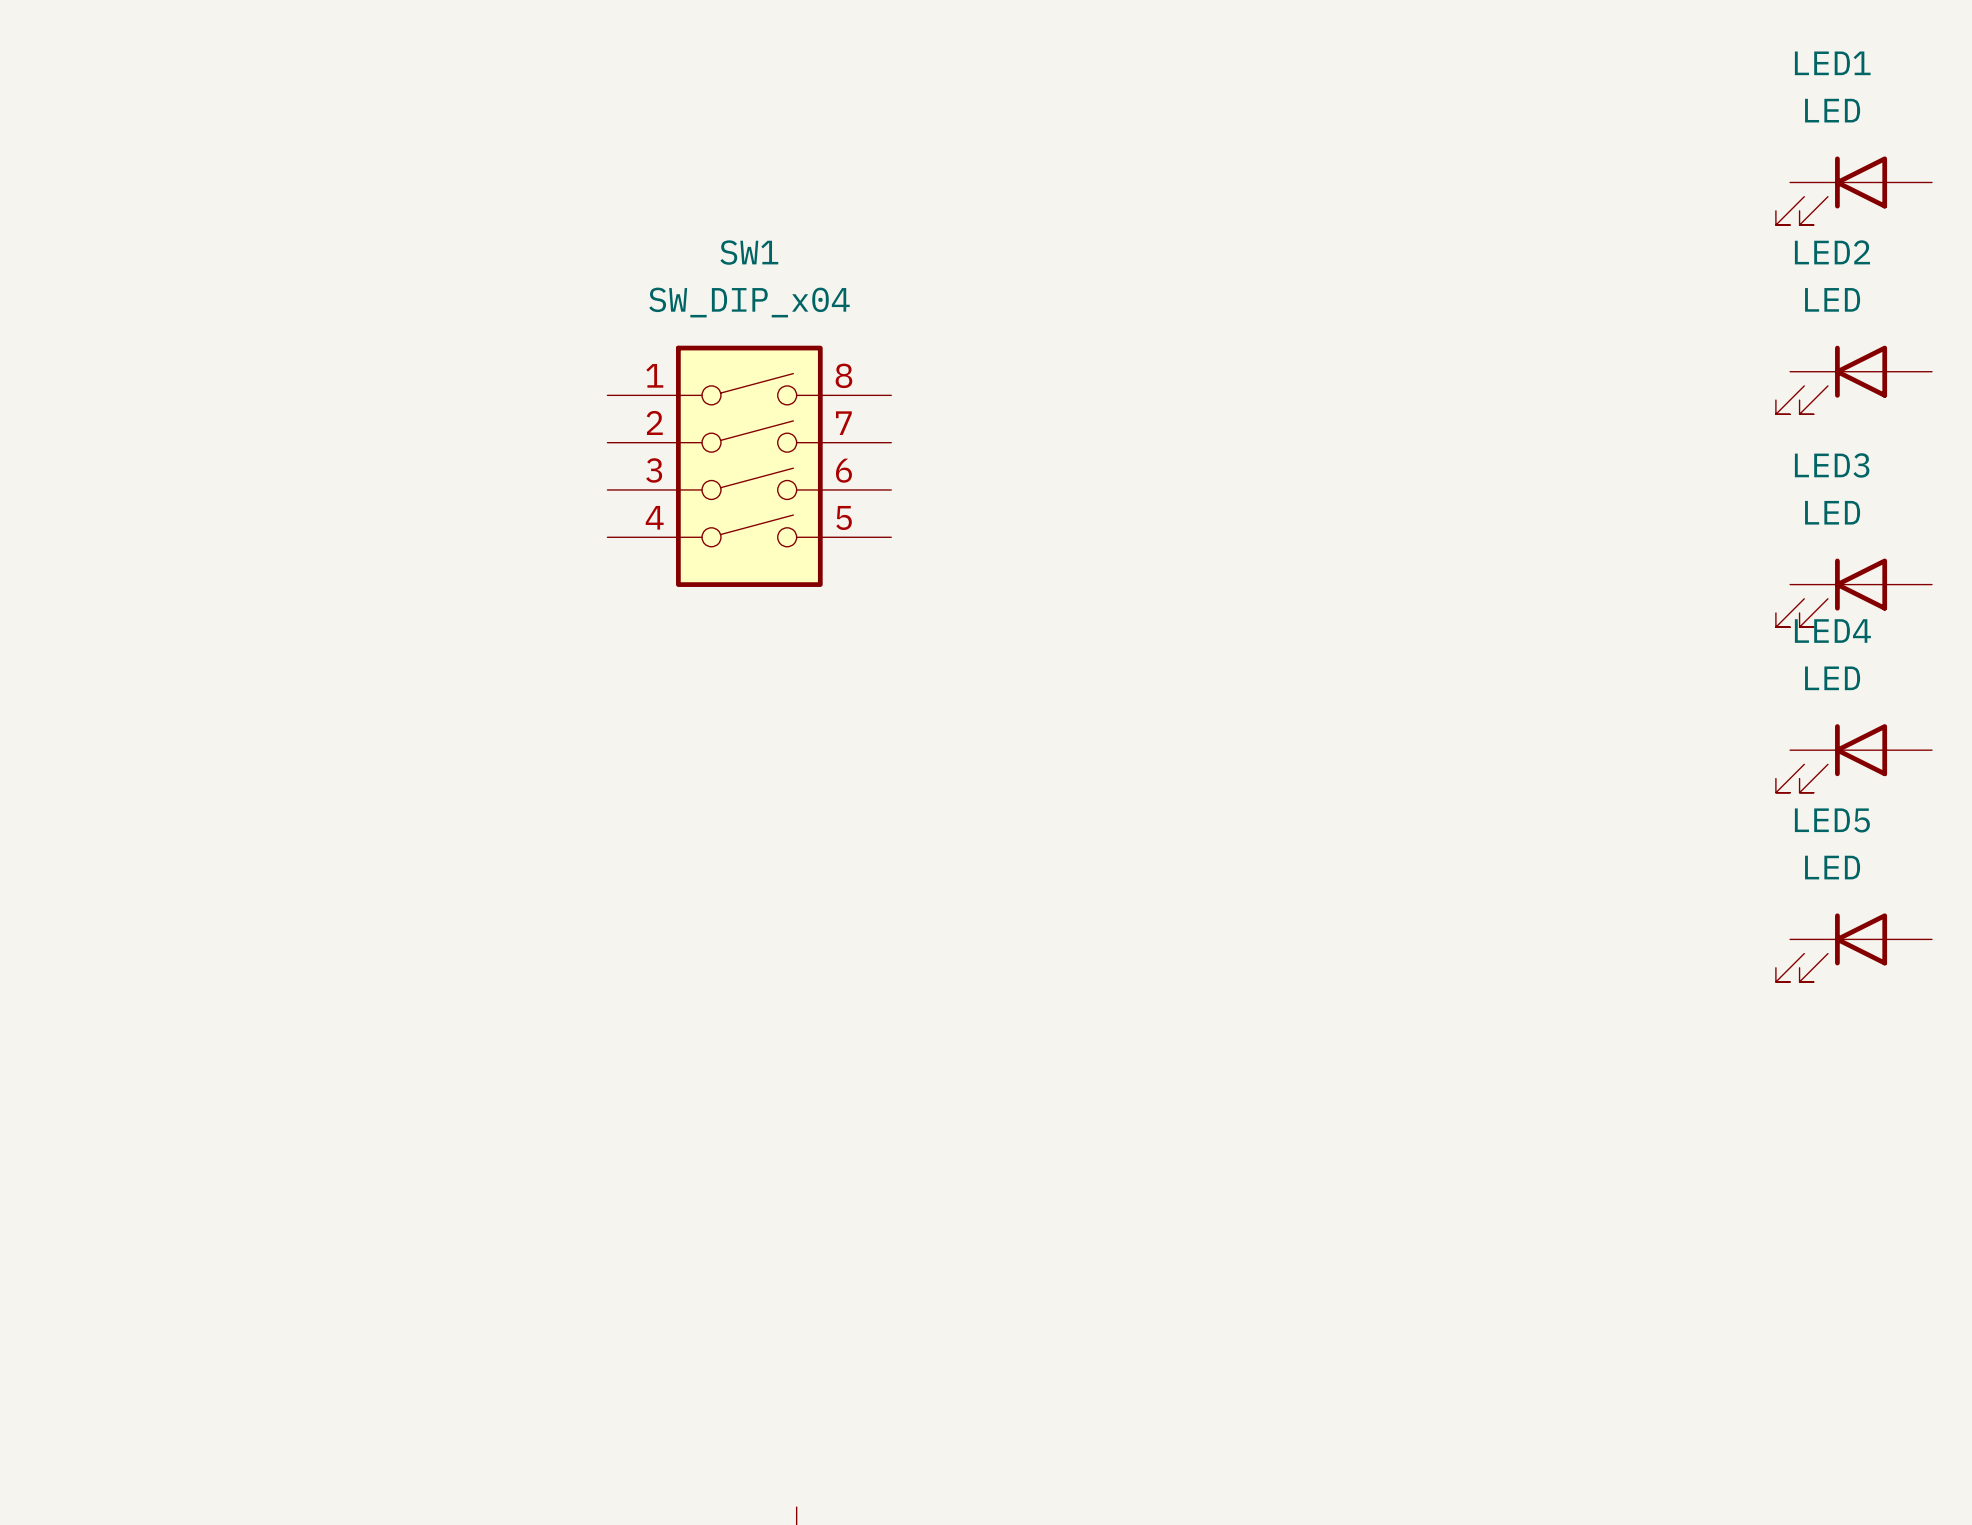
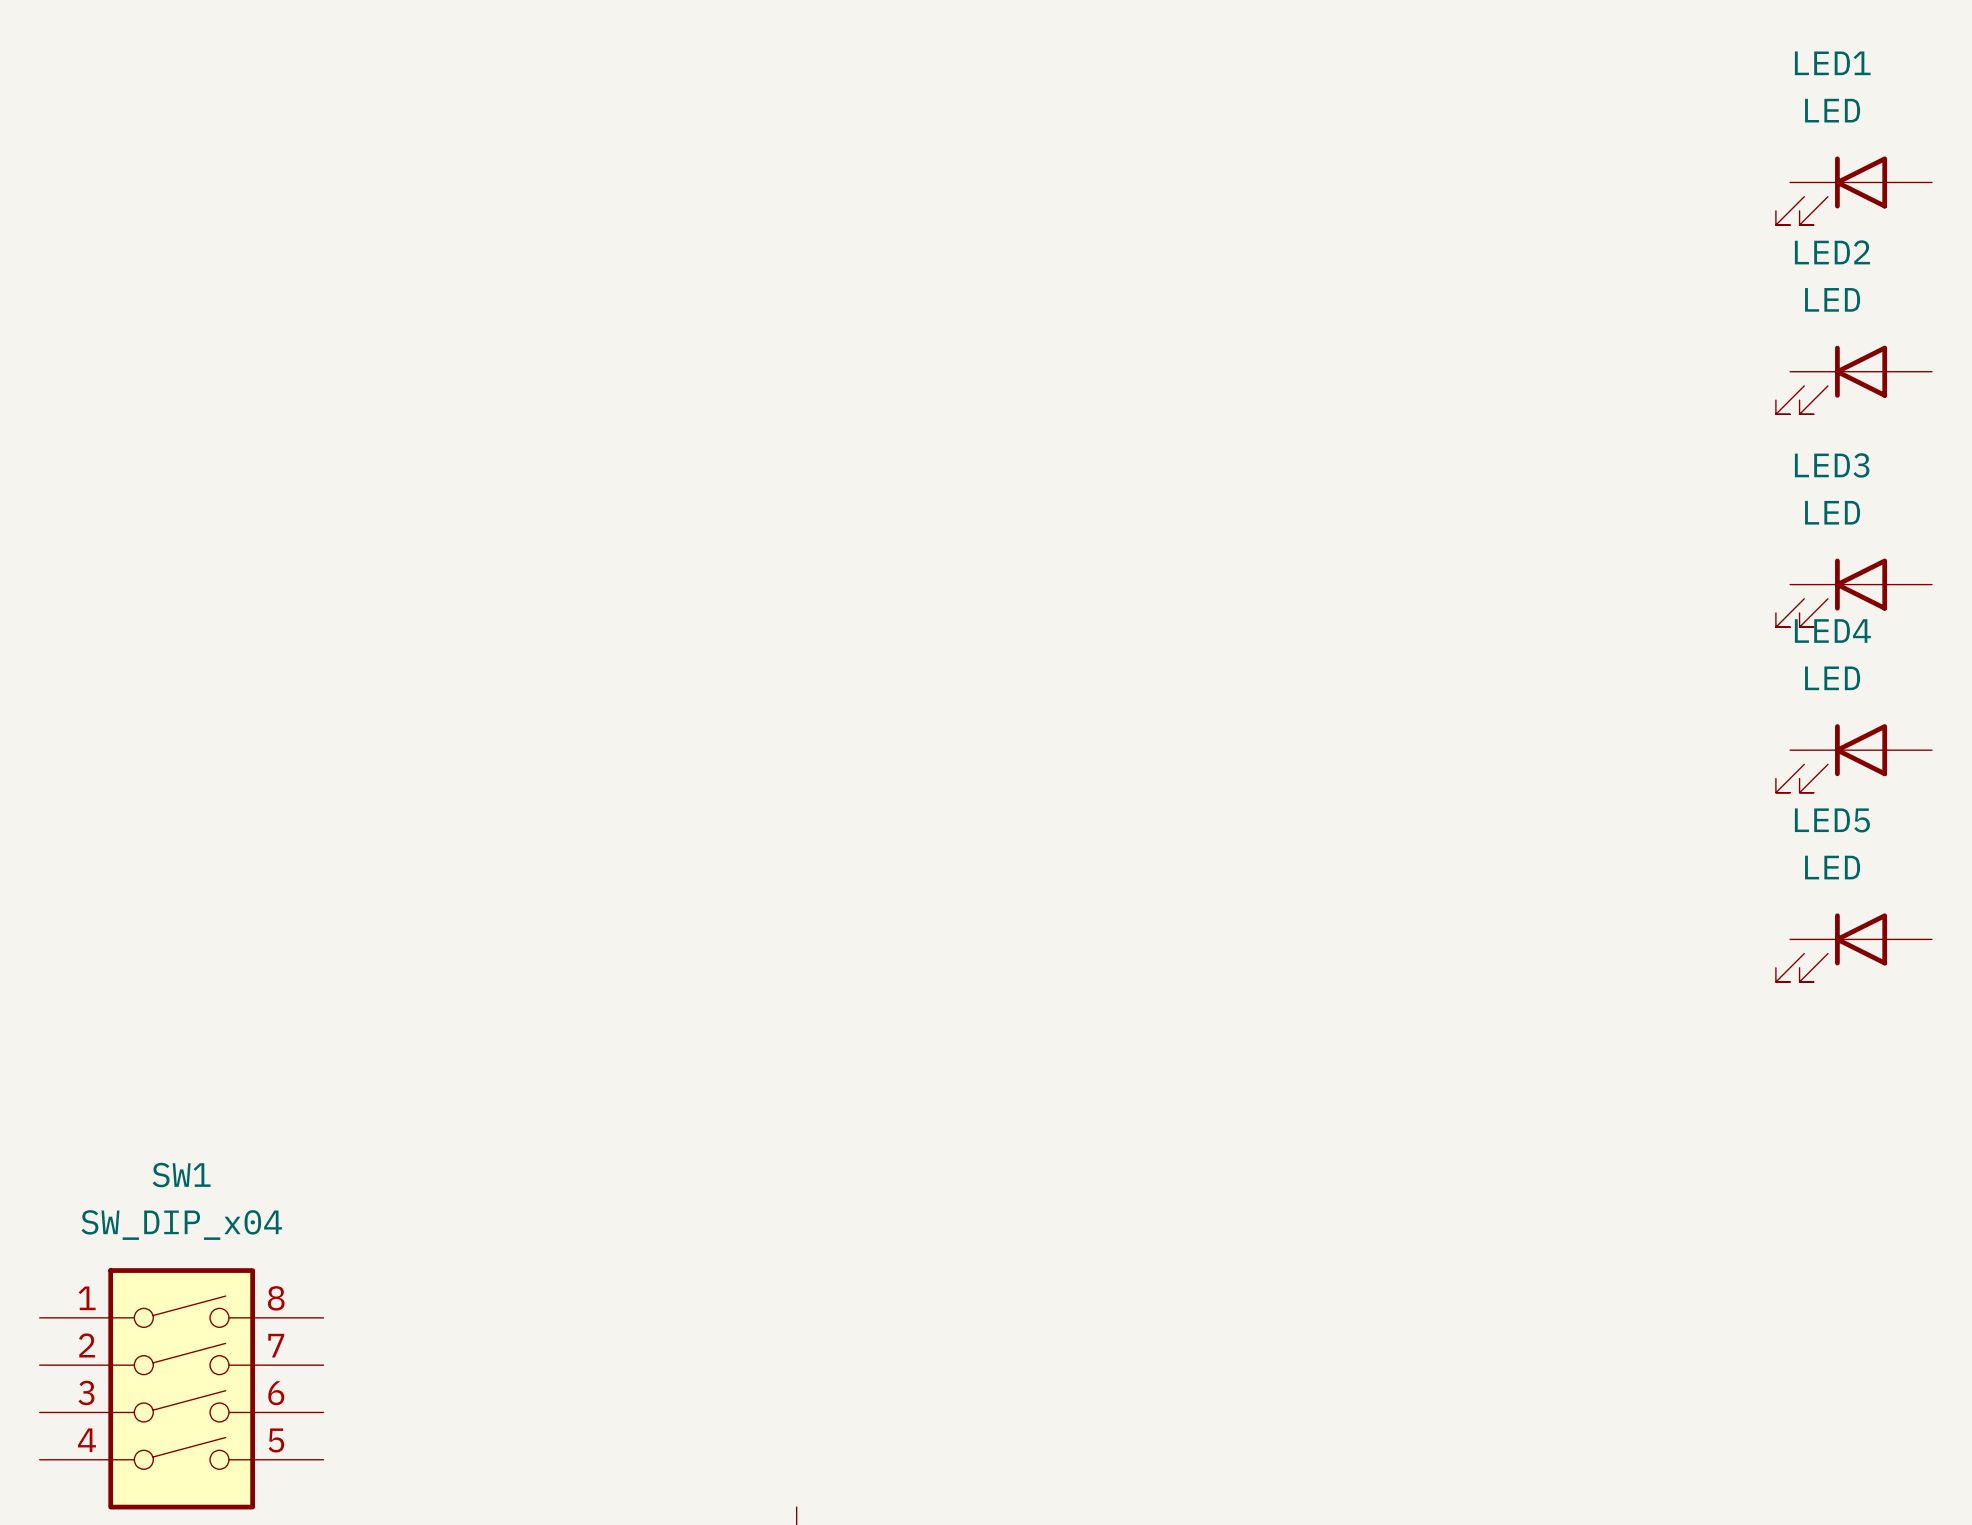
SW1 position: (749, 466) -> (181, 1388)

